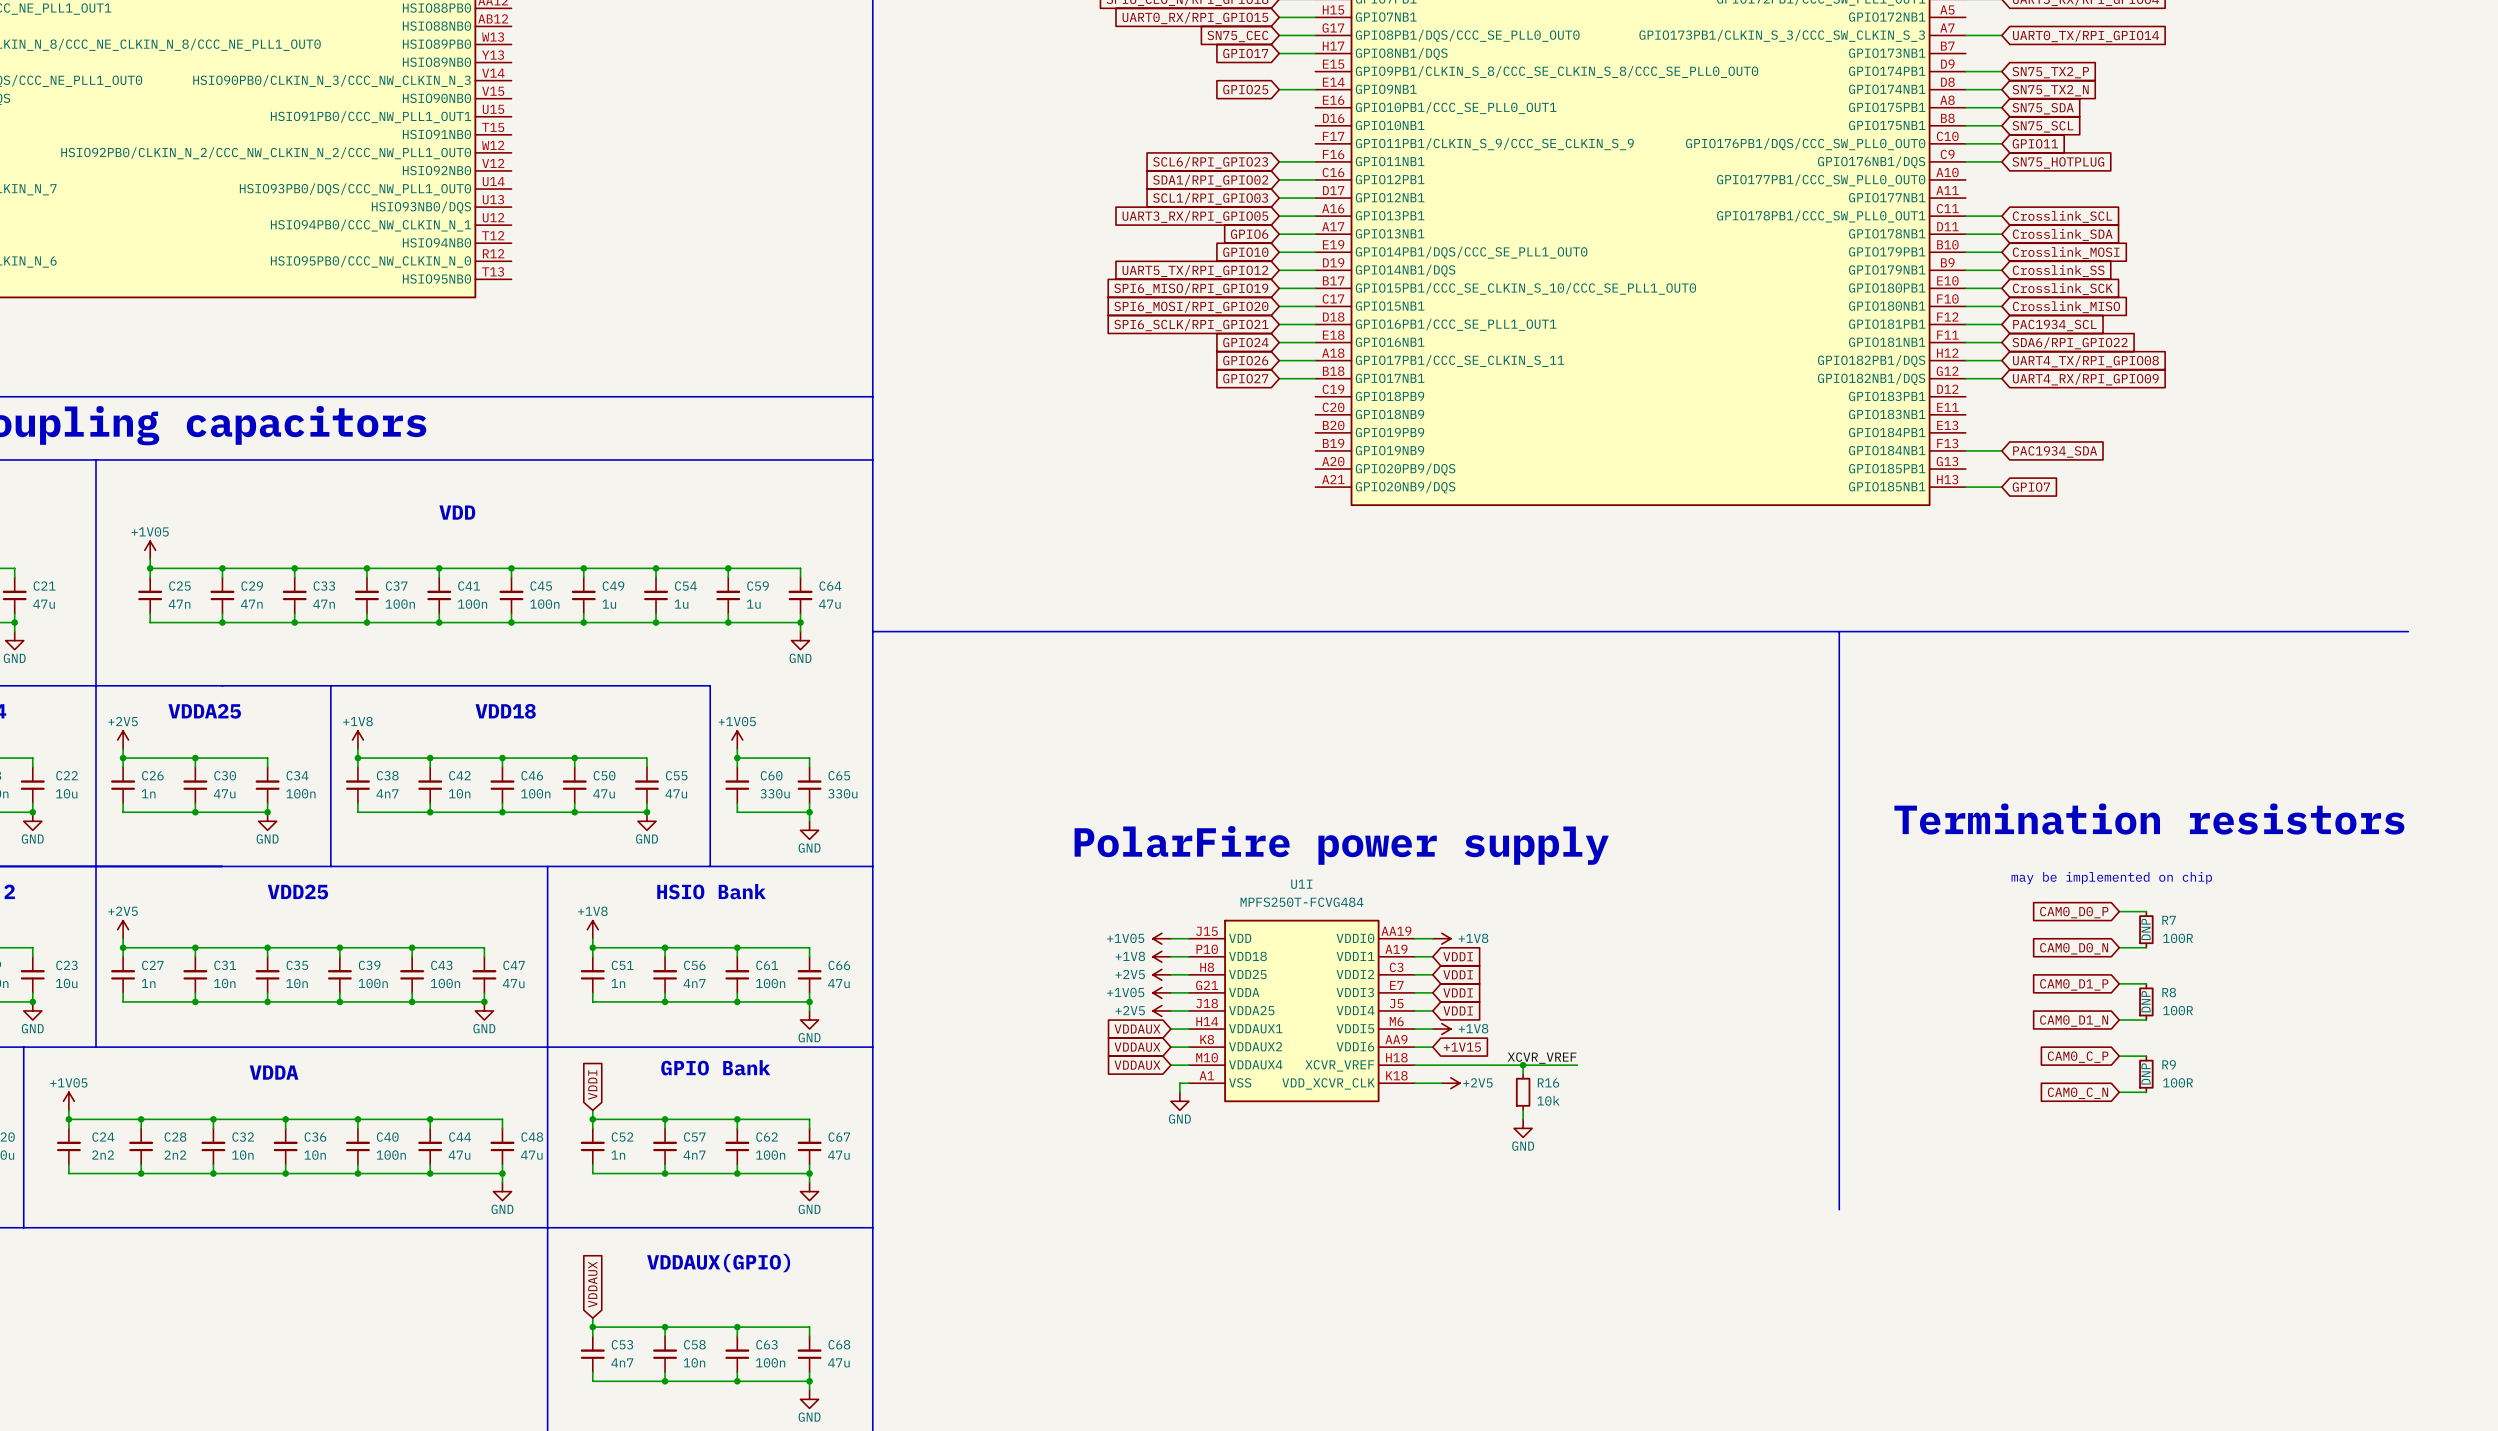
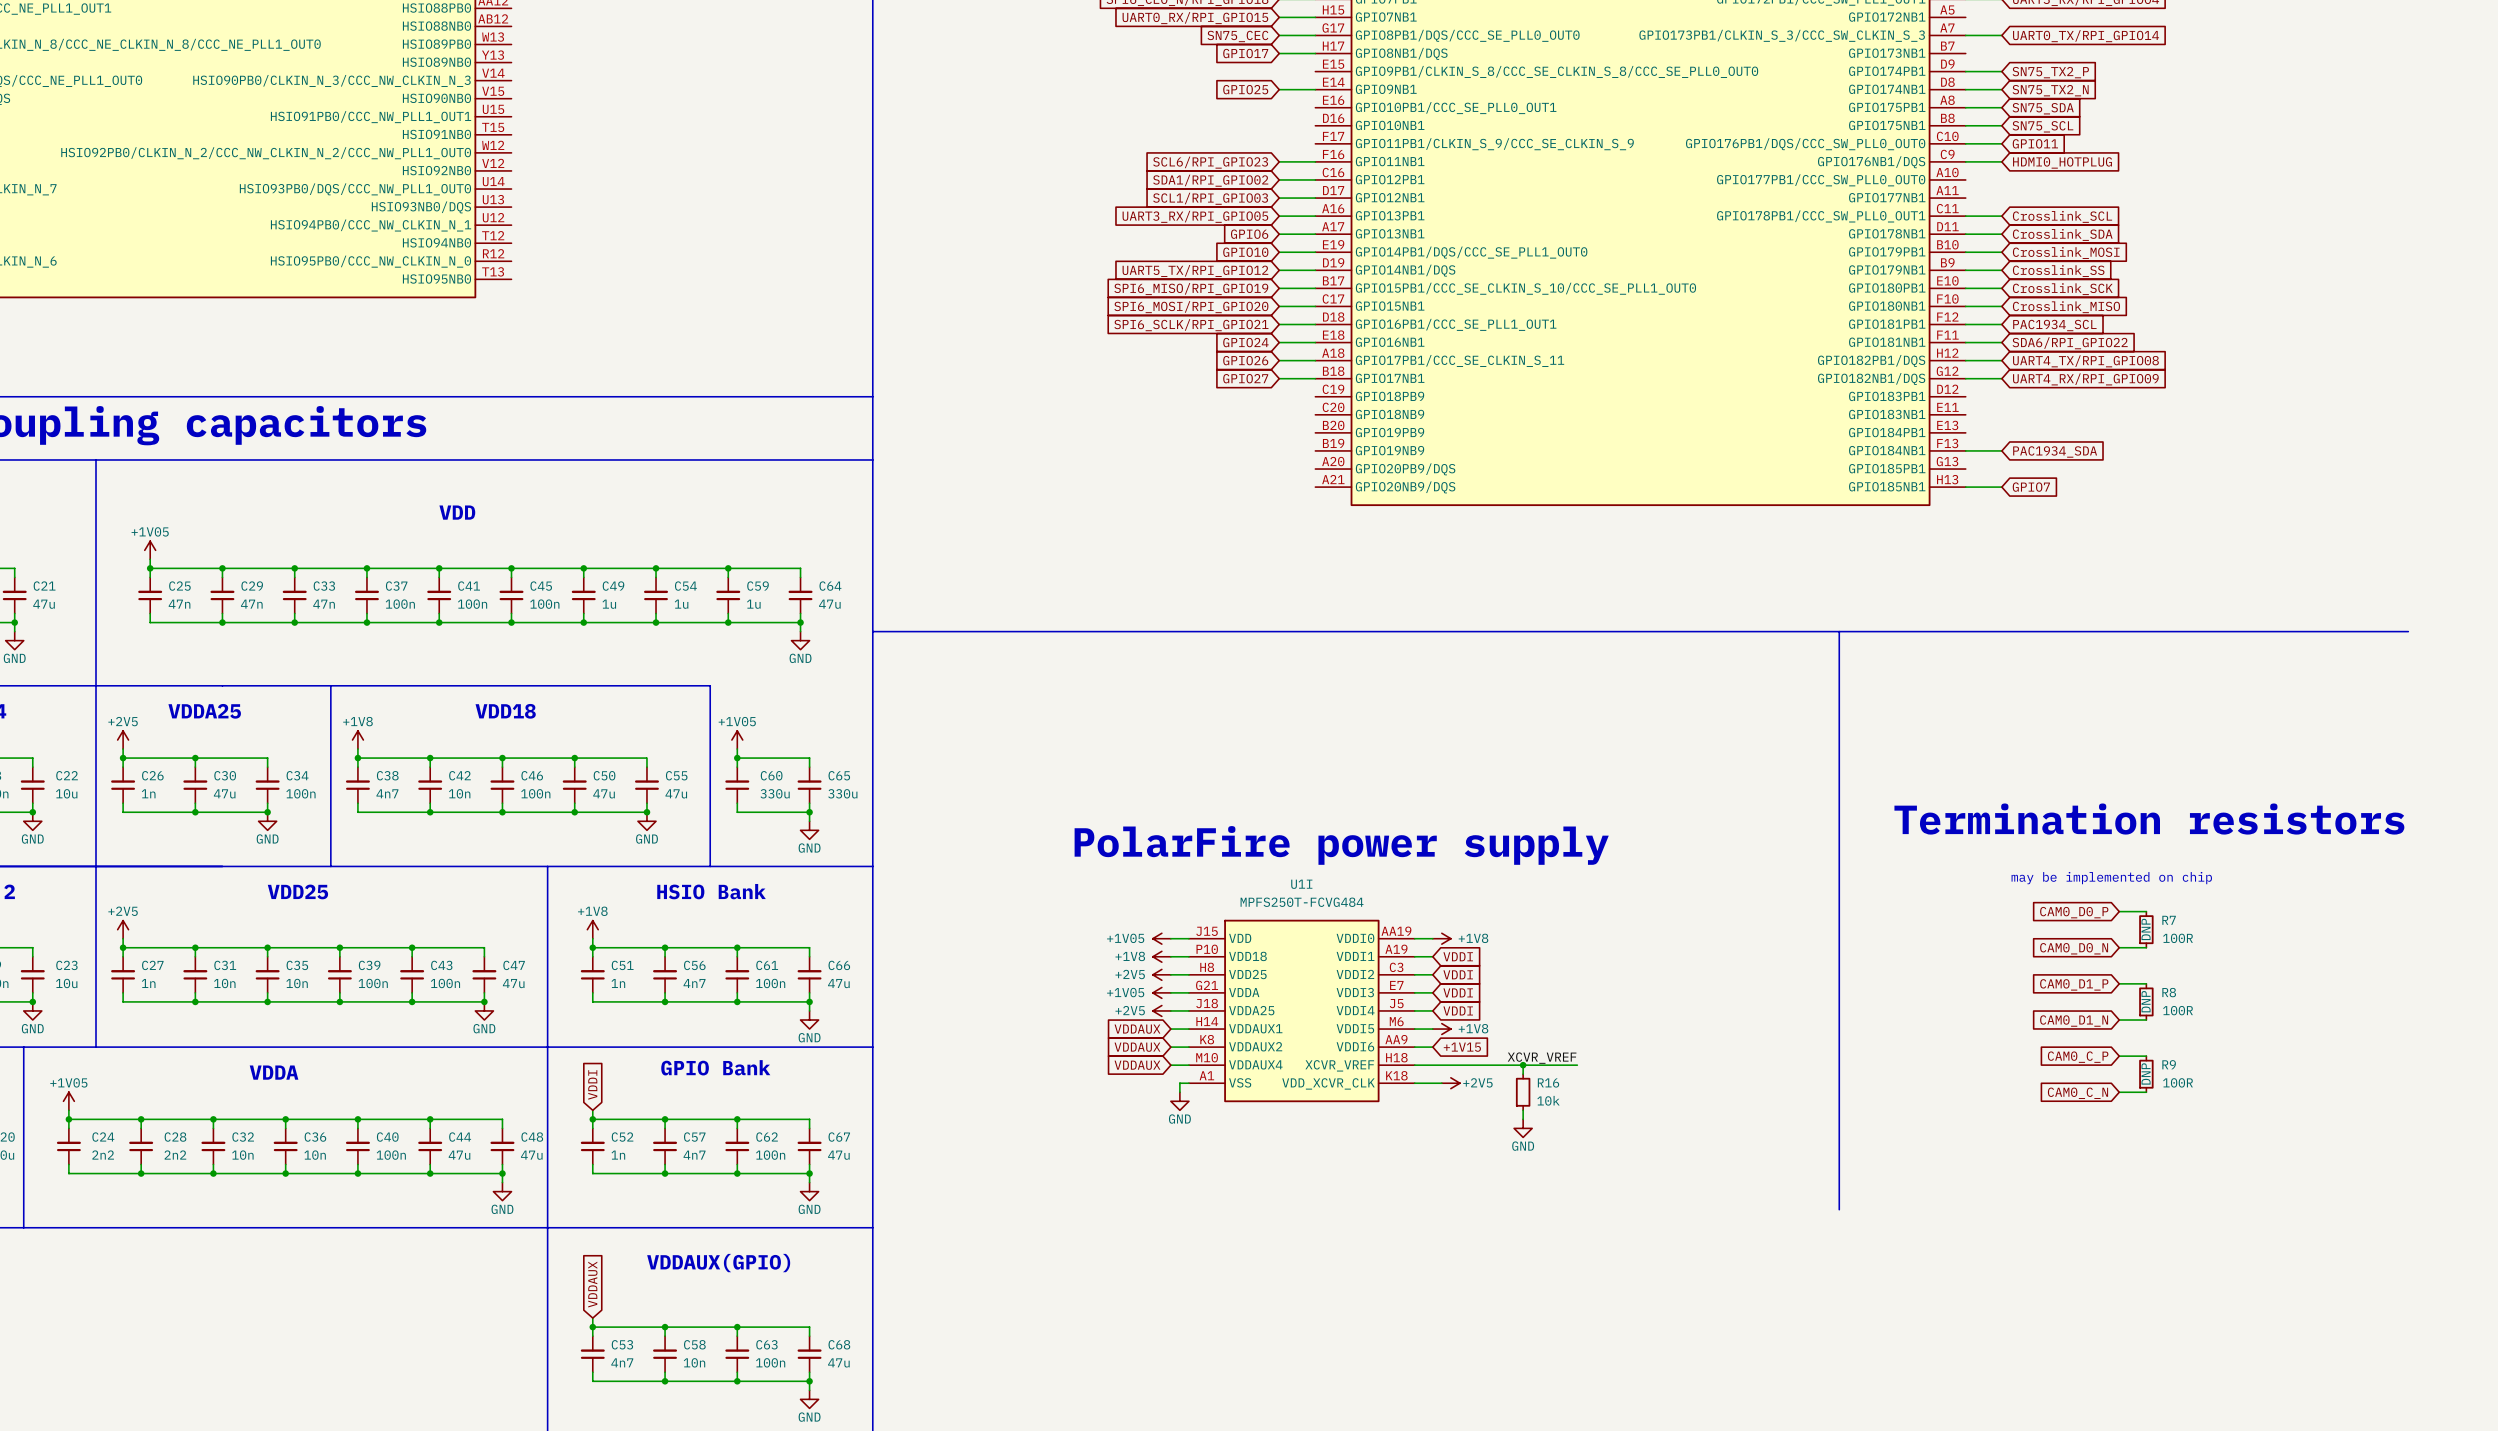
global label: SN75_HOTPLUG (2058, 162) -> HDMI0_HOTPLUG (2062, 162)

